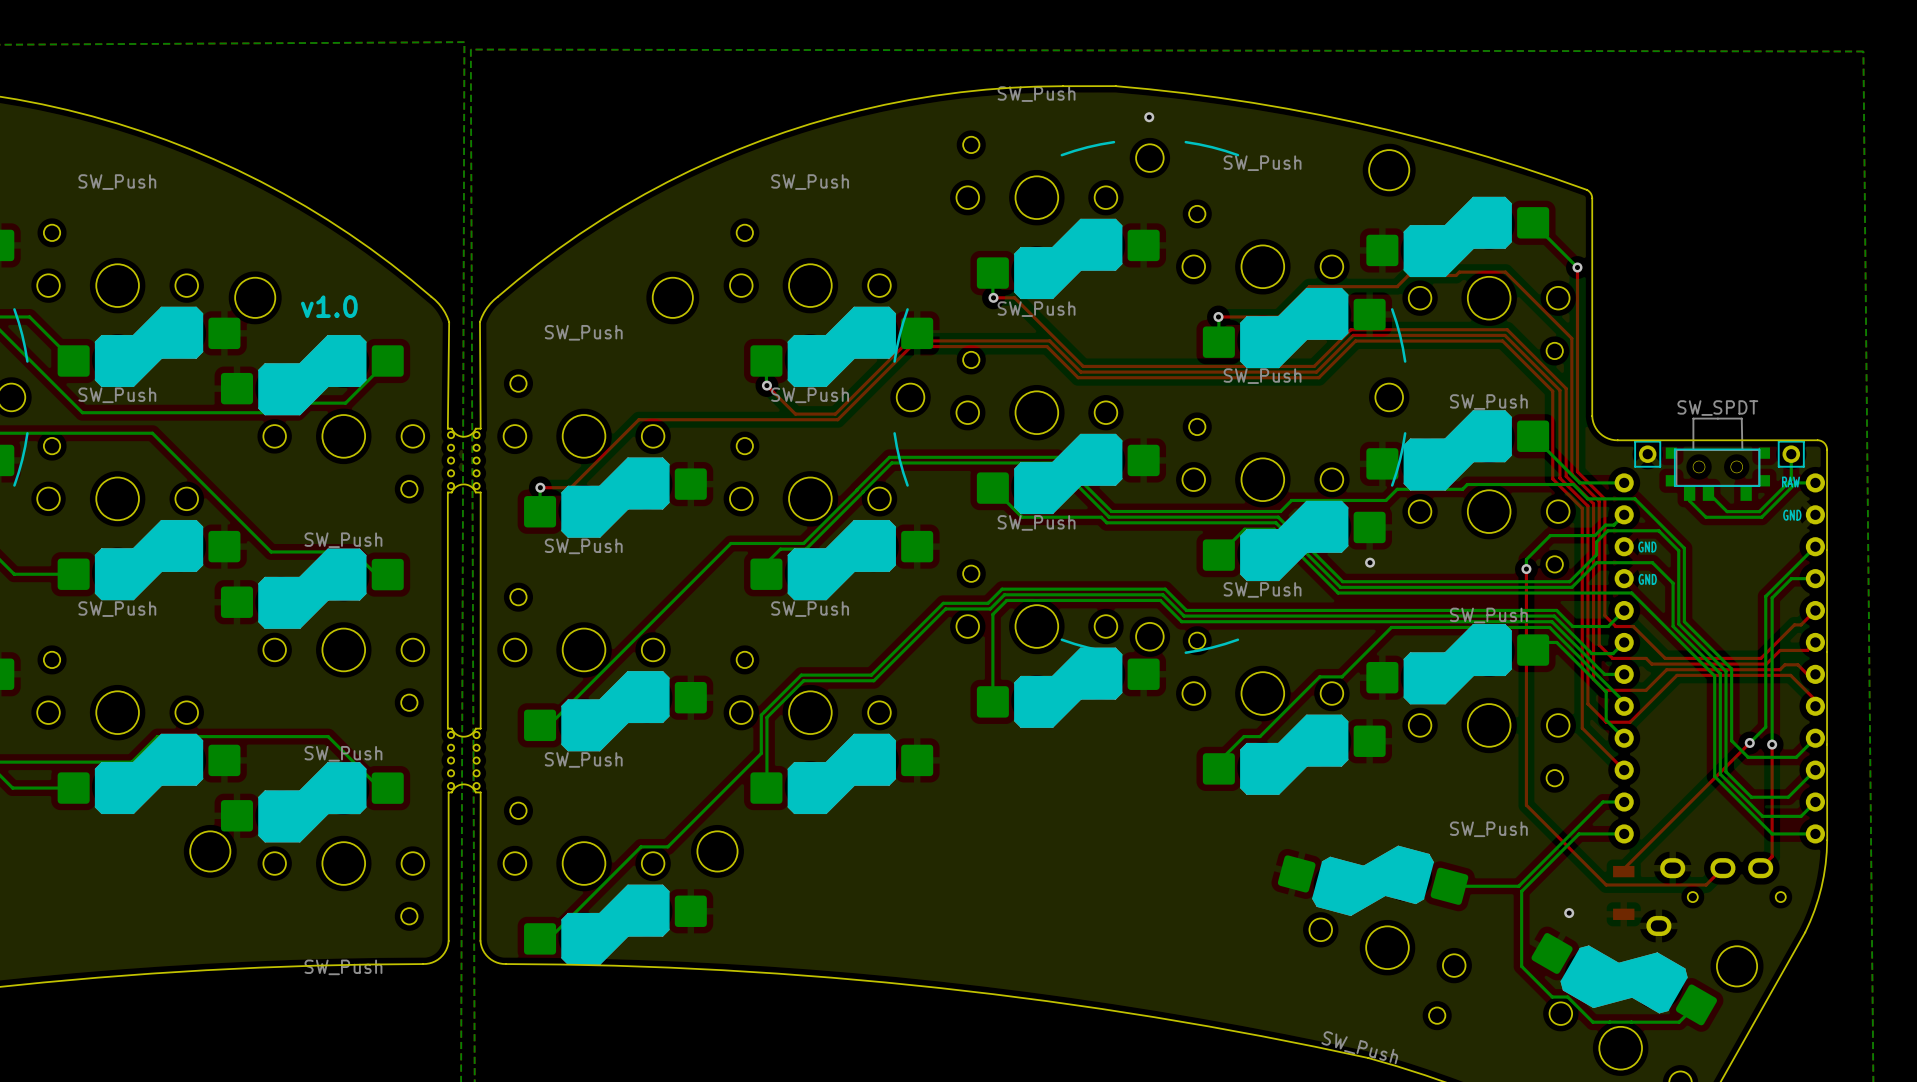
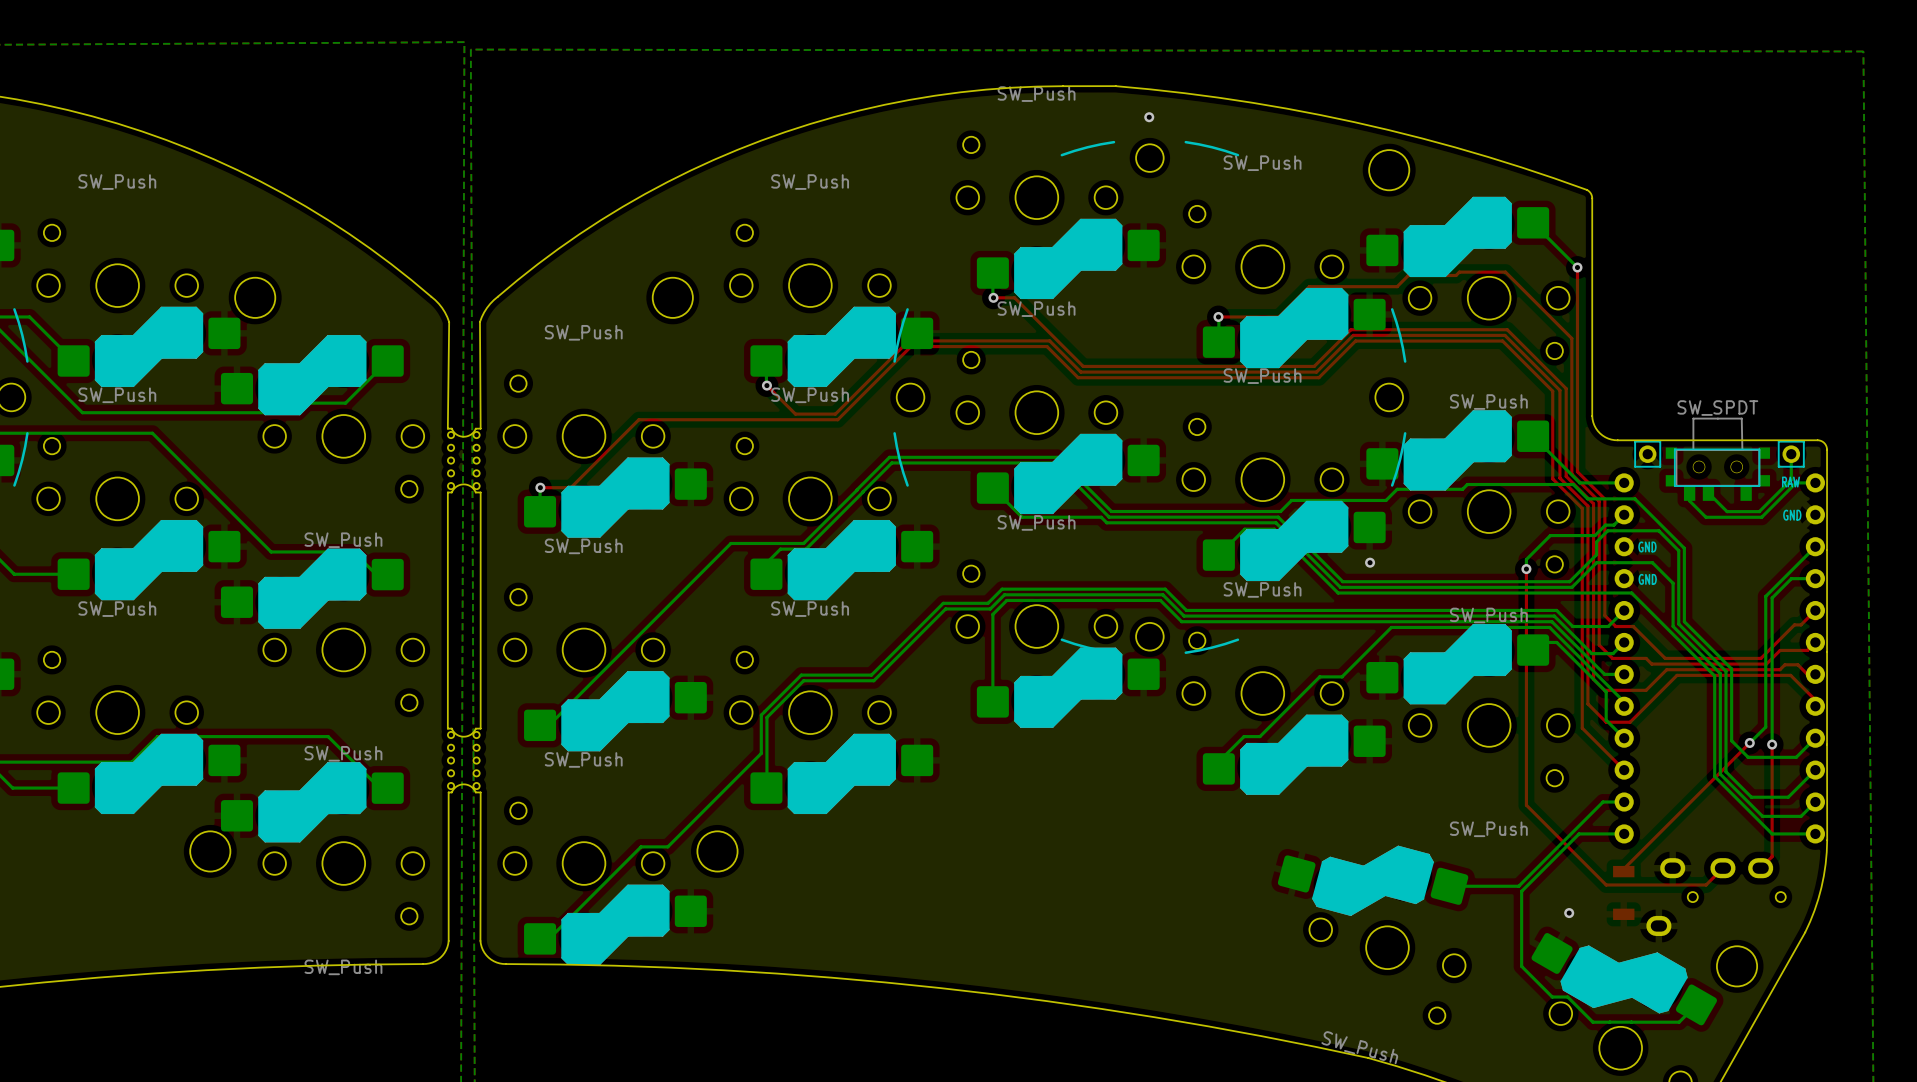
text: v1.0 (329, 306) -> none

